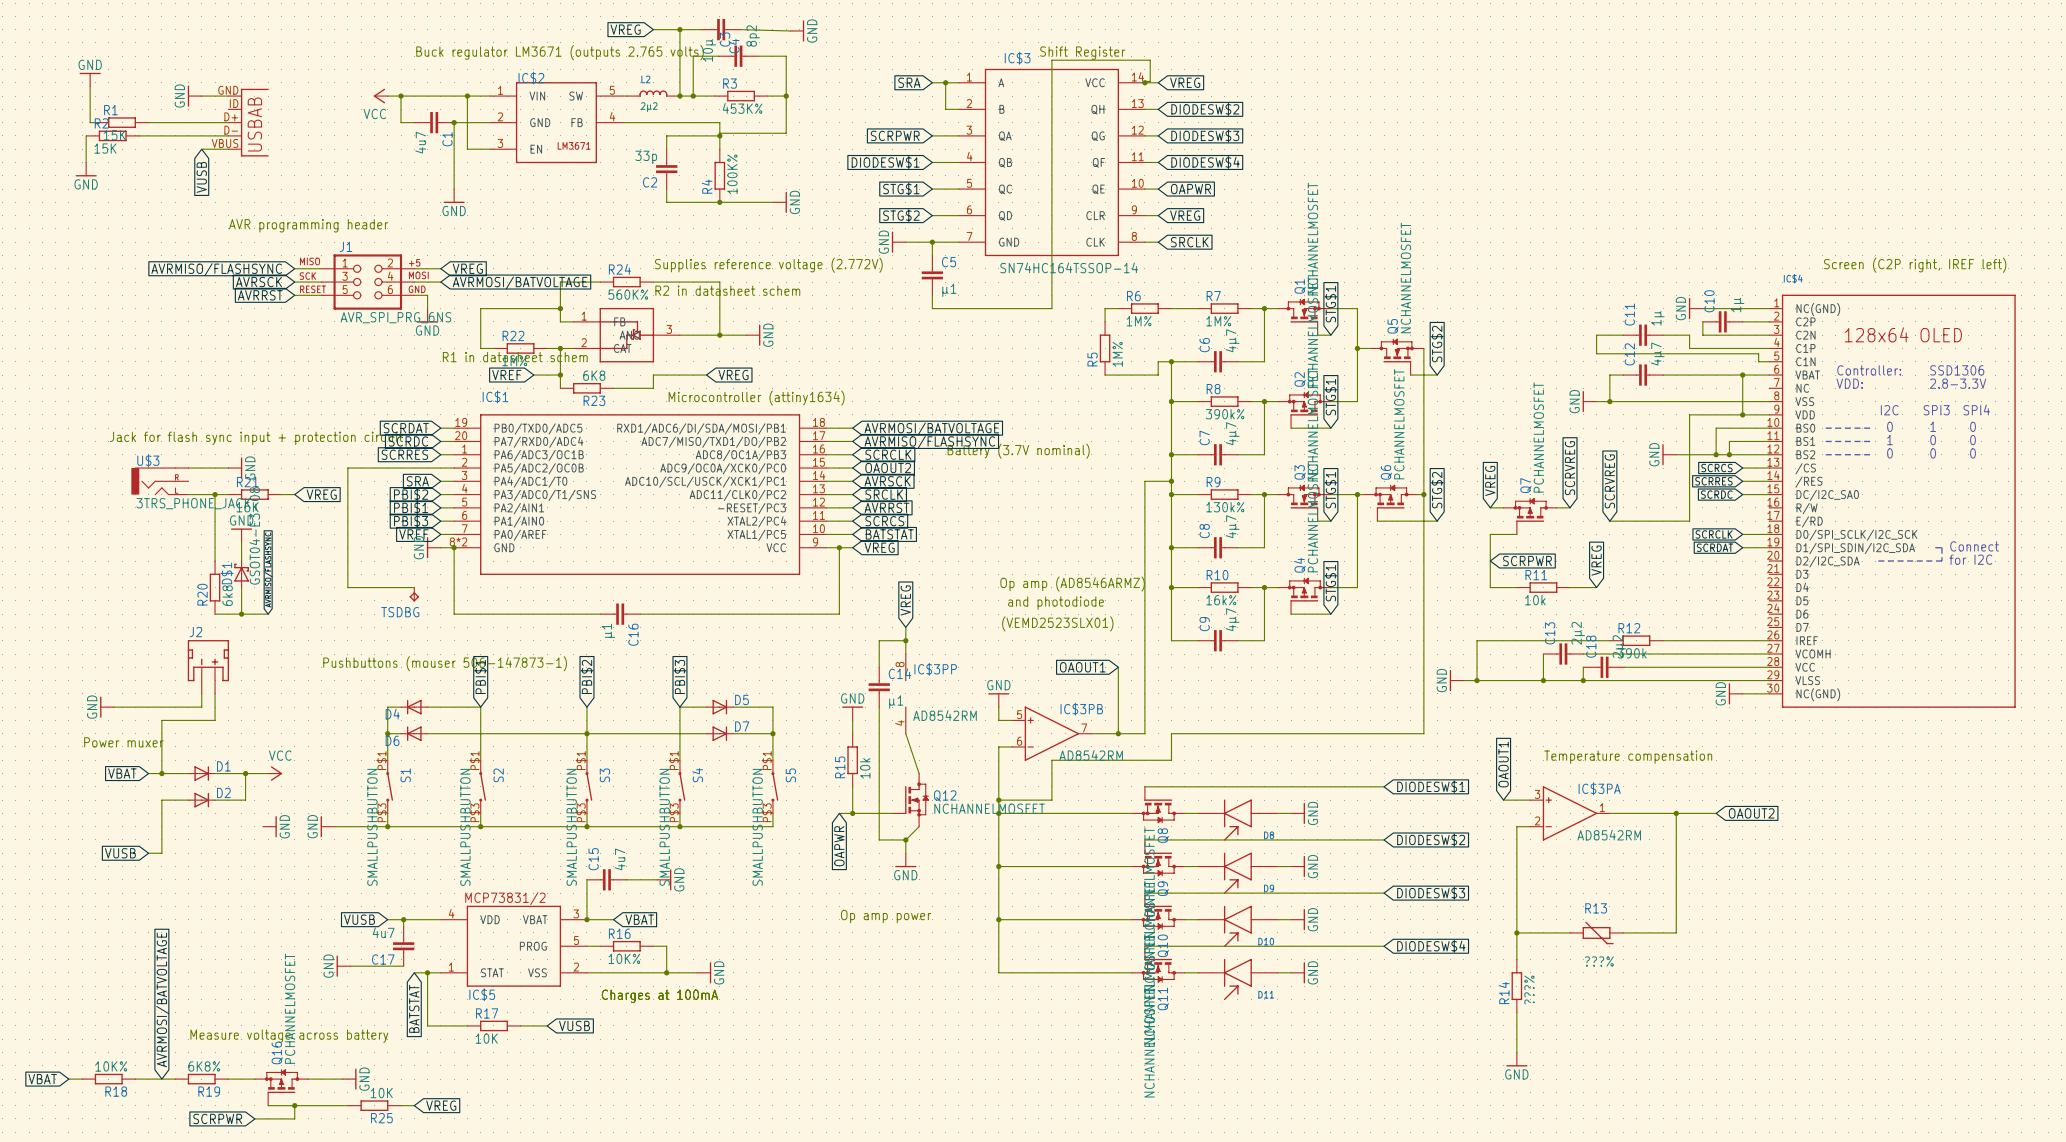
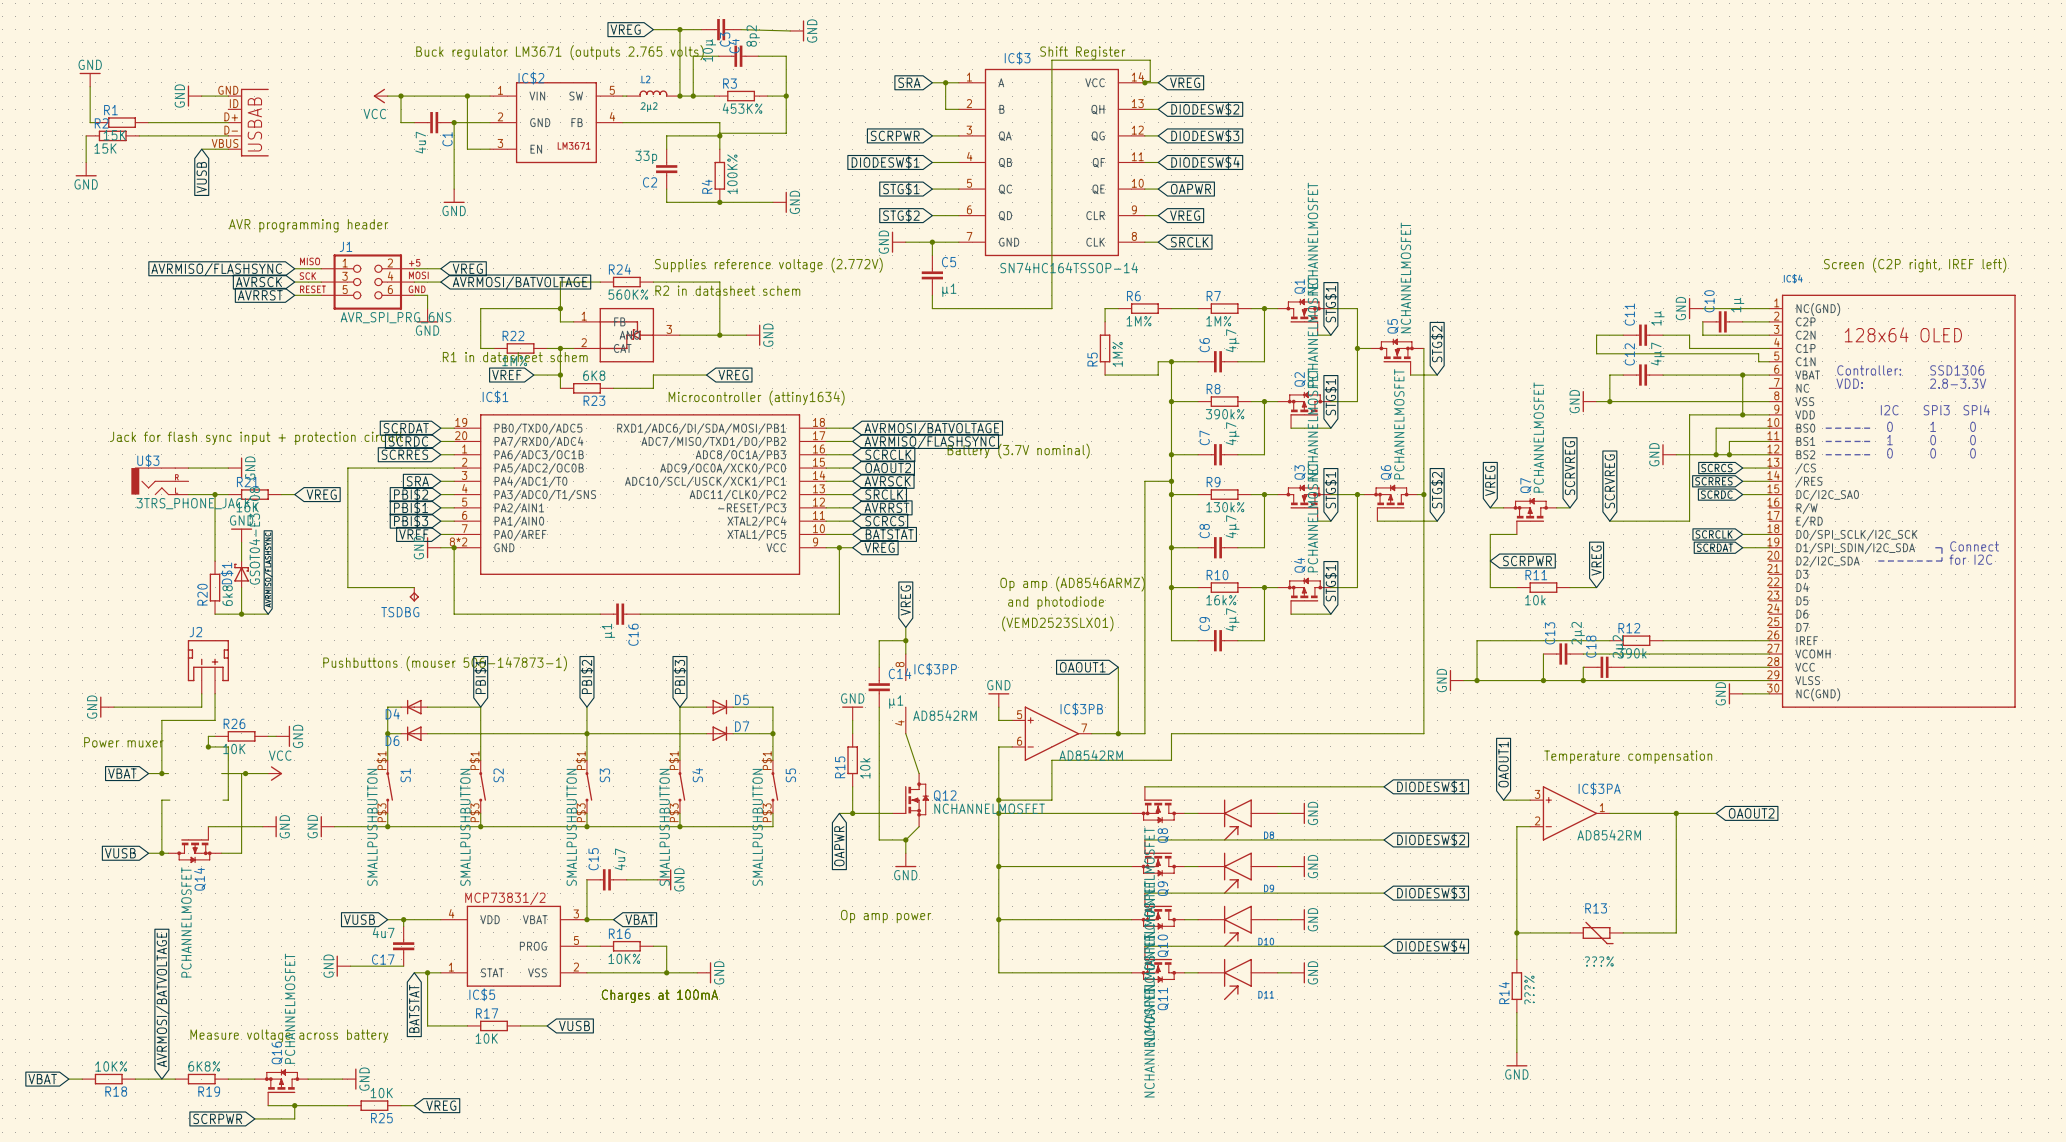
R26: none -> 10K (241, 736)
power symbol: none -> GND (283, 736)
junction: none -> (208, 746)
wire: (168, 773) (188, 773) -> none
D1: (201, 773) -> none
wire: (215, 773) (221, 773) -> (161, 853) (168, 853)
wire: none -> (241, 773) (241, 853) (221, 853)
wire: (245, 773) (245, 800) (228, 800) -> (215, 736) (208, 736) (208, 746) (228, 746) (228, 800)
wire: (169, 800) (188, 800) -> none
D2: (201, 800) -> none
wire: (215, 800) (222, 800) -> (268, 736) (276, 736)
wire: none -> (208, 826) (262, 826)
Q14: none -> PCHANNELMOSFET (195, 844)
junction: none -> (161, 853)

